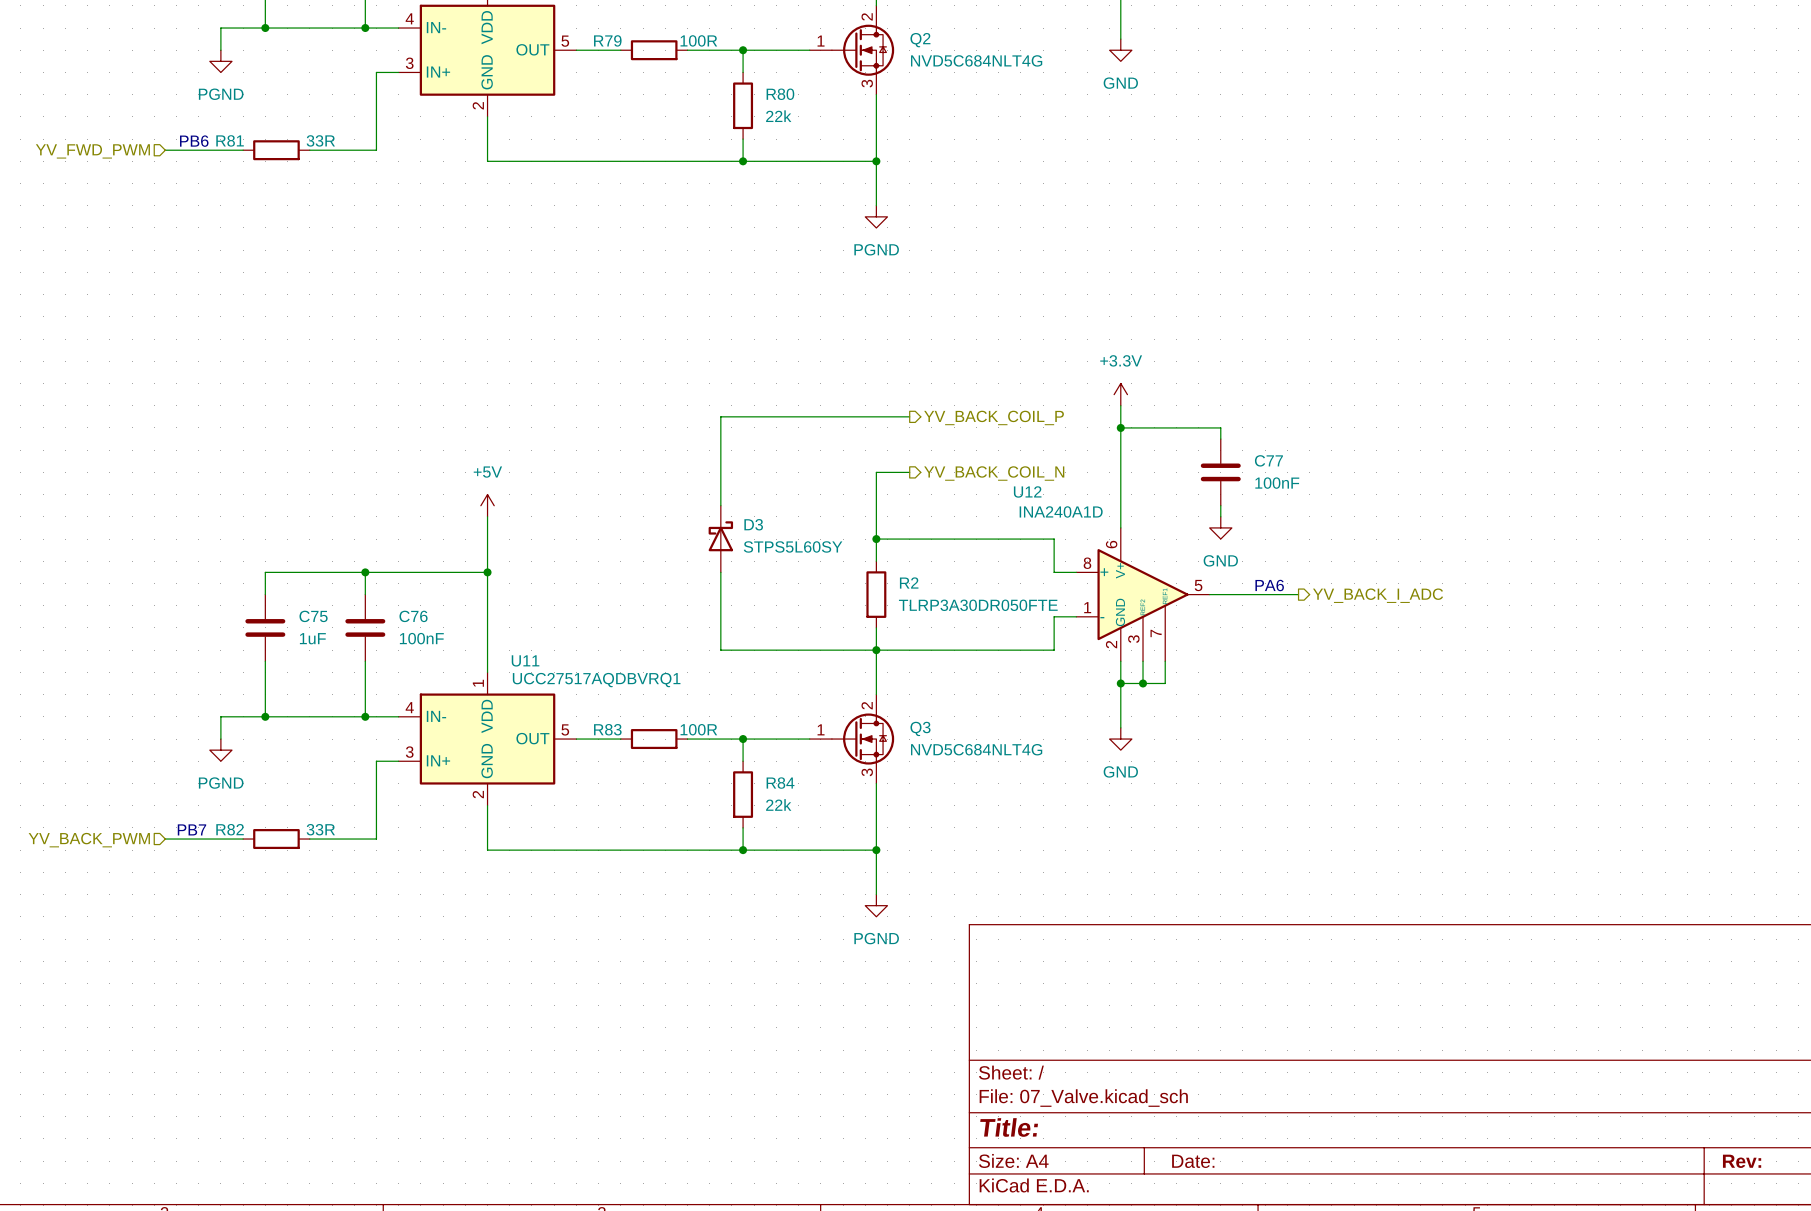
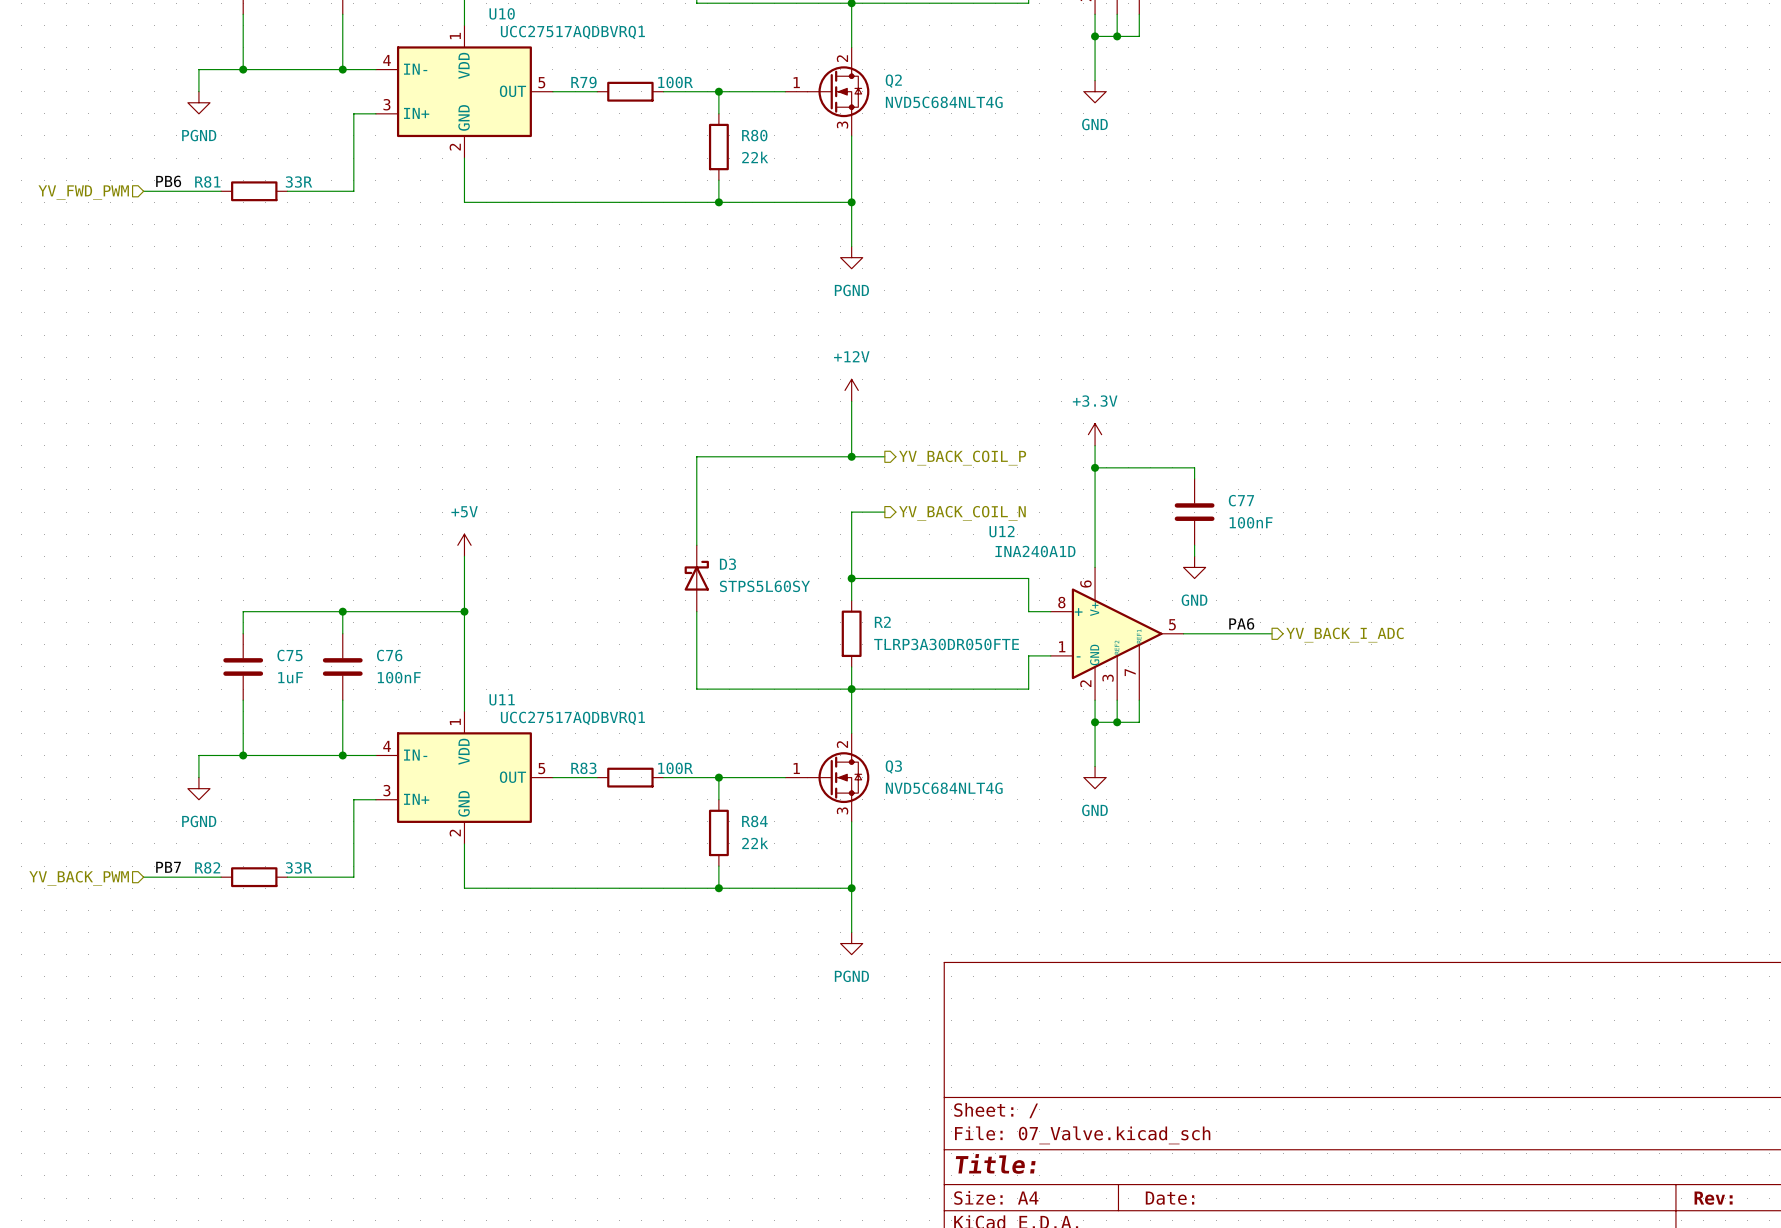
label: none -> PB6 (168, 181)
text: PB6 (194, 141) -> none
power symbol: none -> +12V (851, 390)
wire: none -> (851, 401) (851, 456)
junction: none -> (851, 456)
label: none -> PA6 (1241, 623)
text: PA6 (1269, 585) -> none
text: PB7 (191, 829) -> none
label: none -> PB7 (168, 867)

